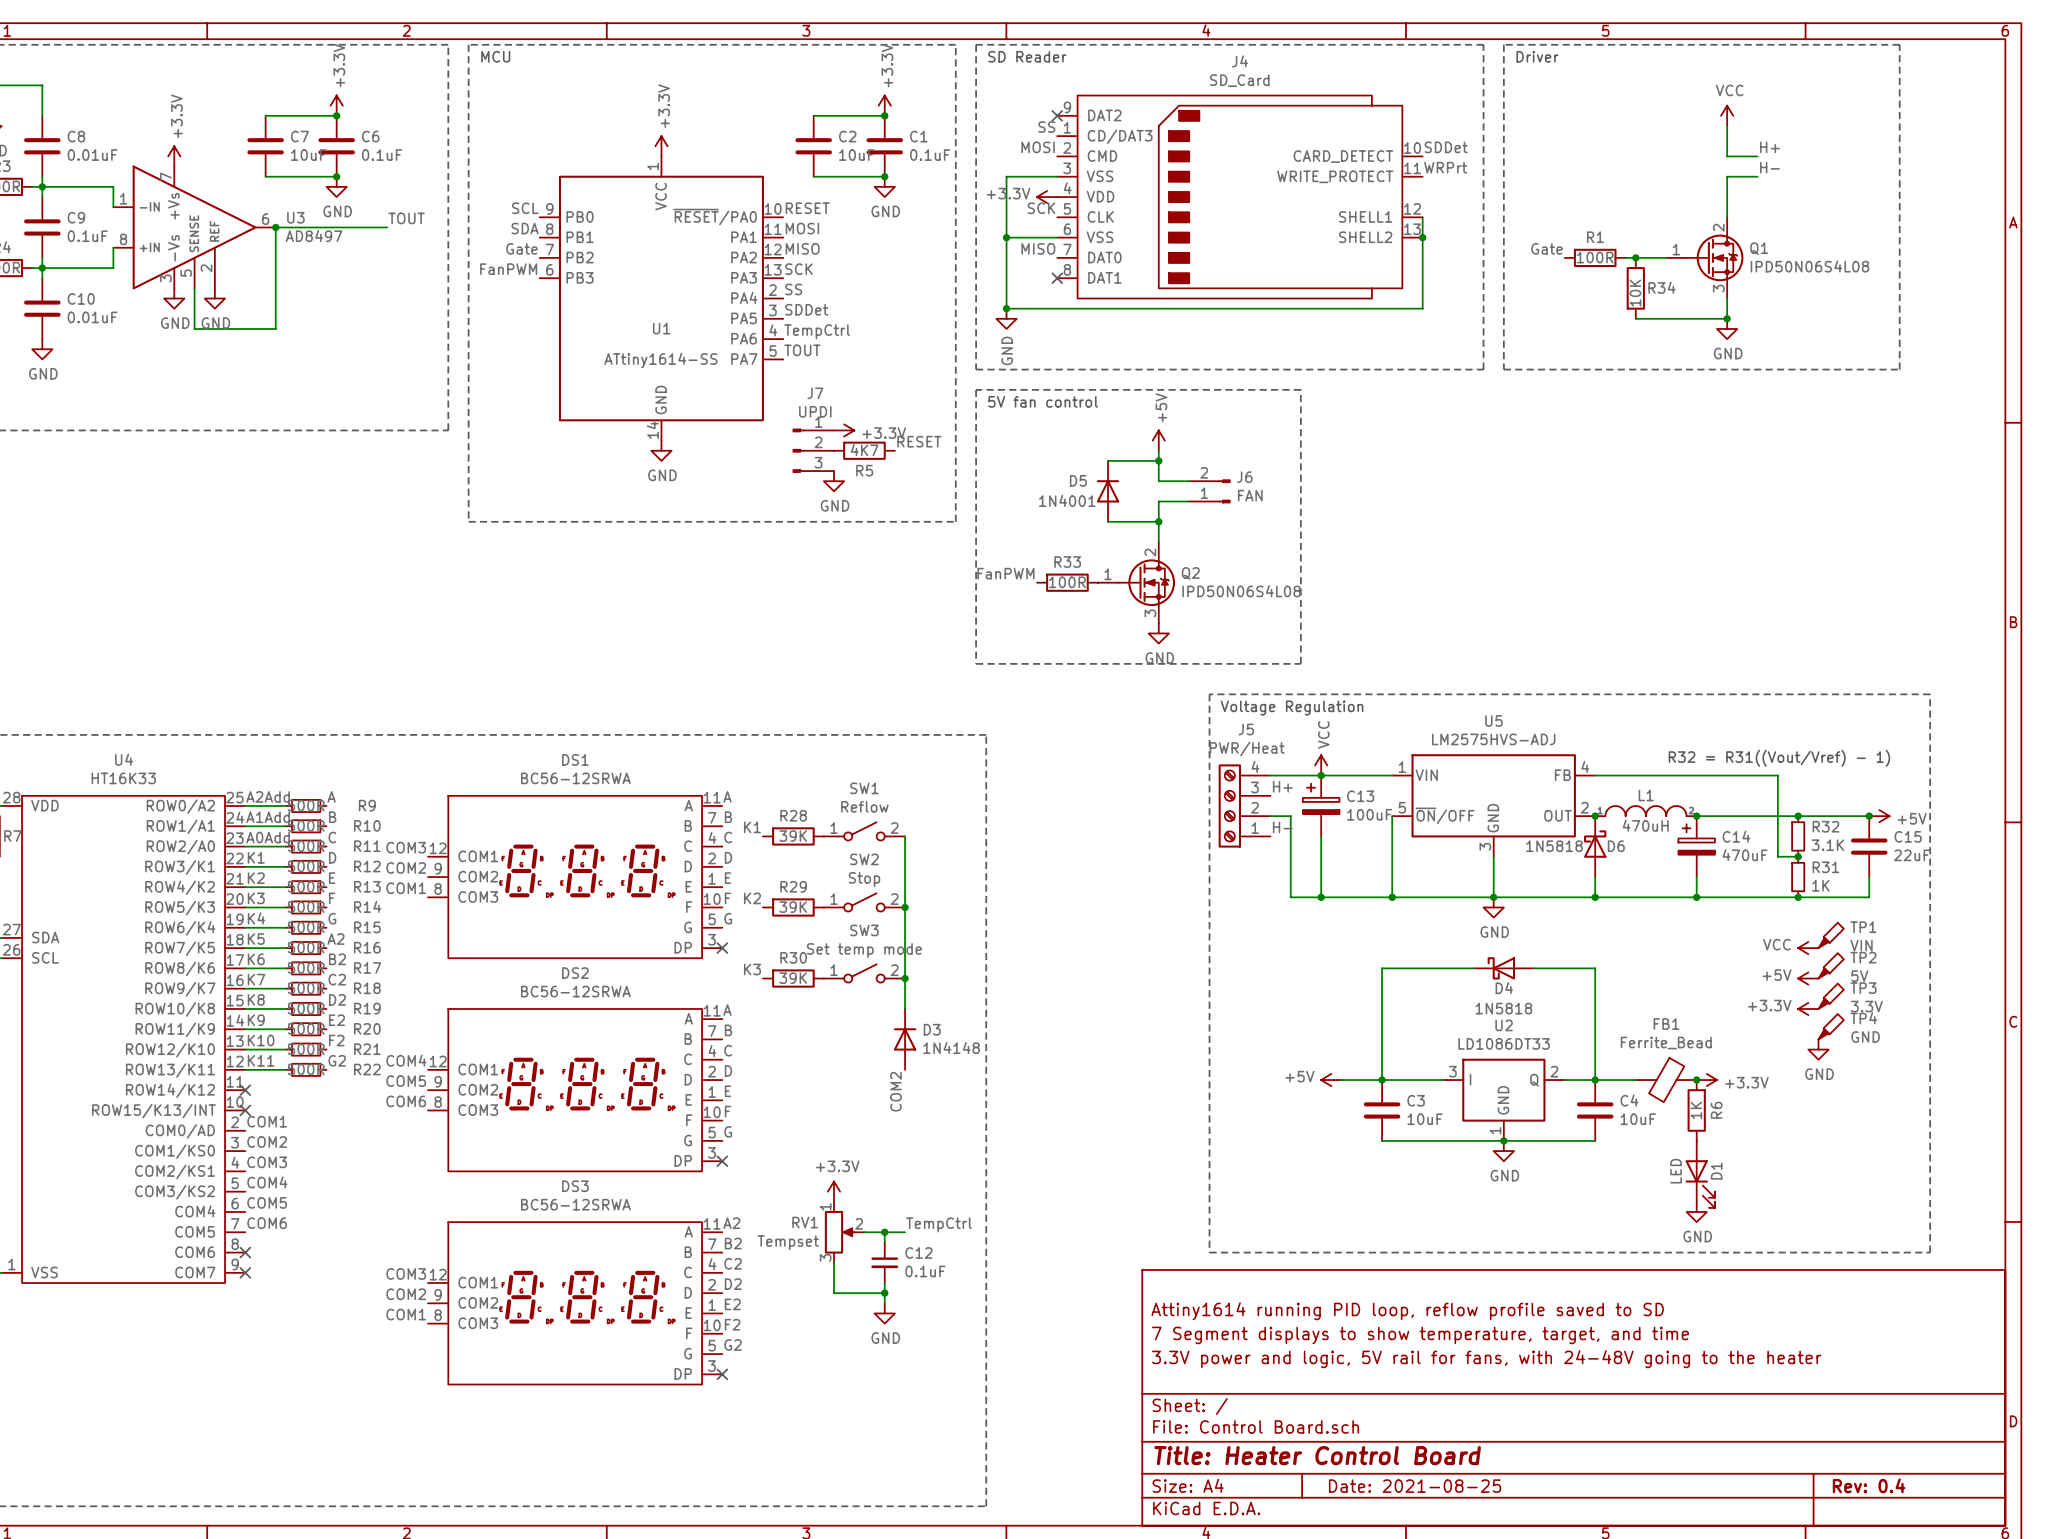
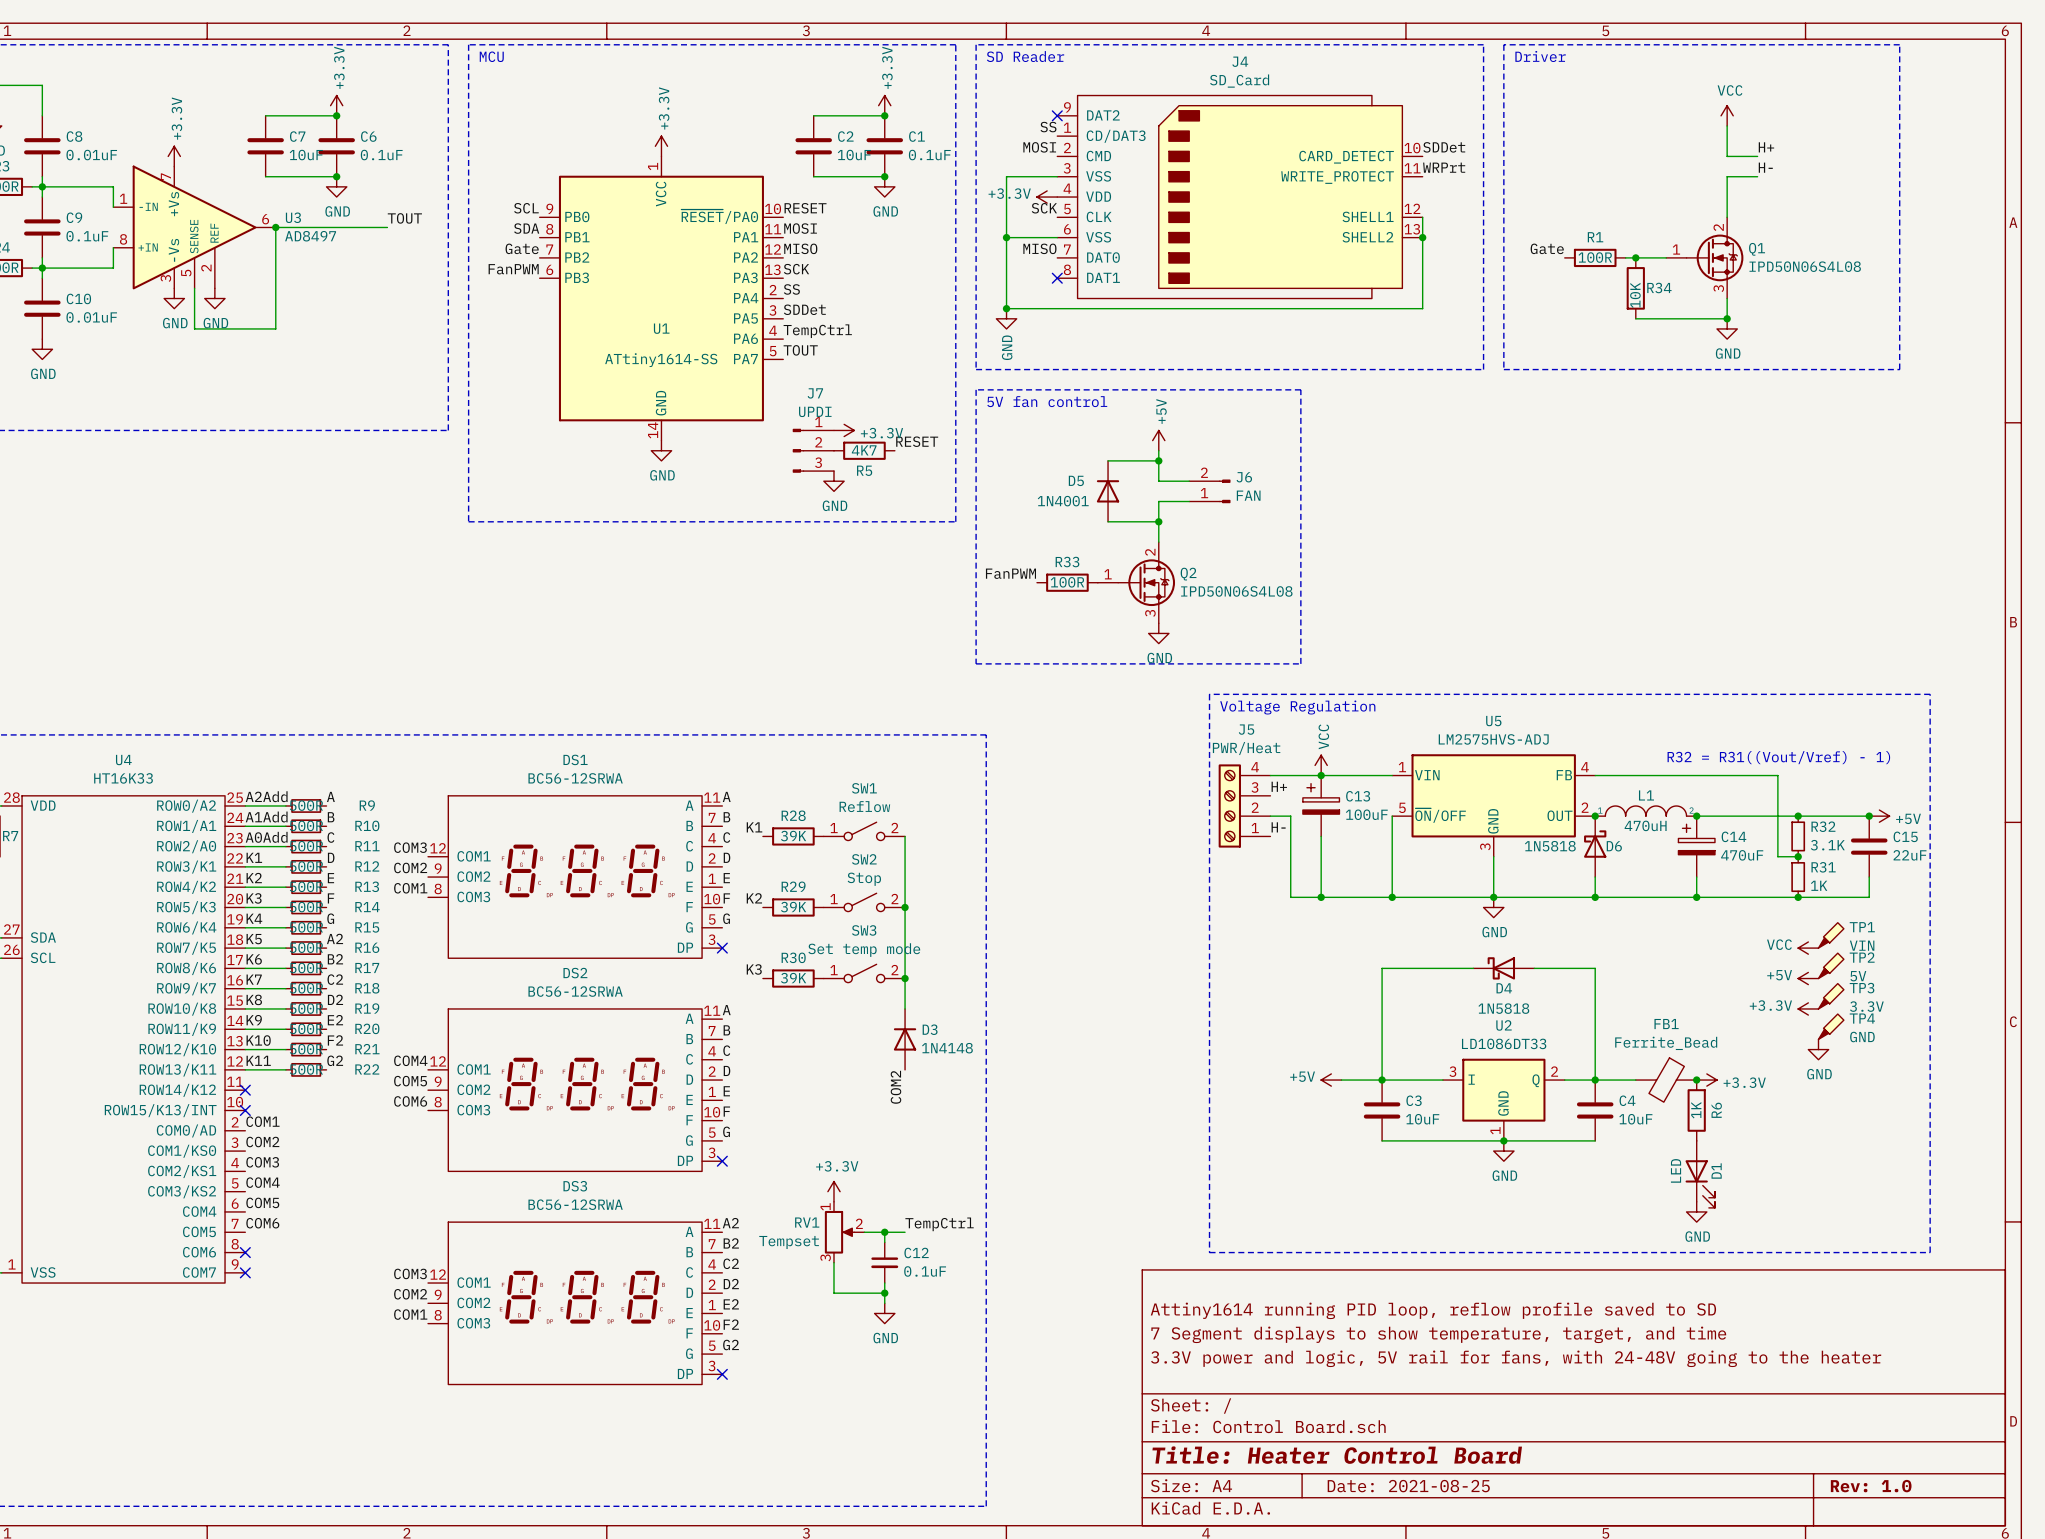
title block: Rev: 0.4 (1869, 1485) -> Rev: 1.0 (1871, 1486)

